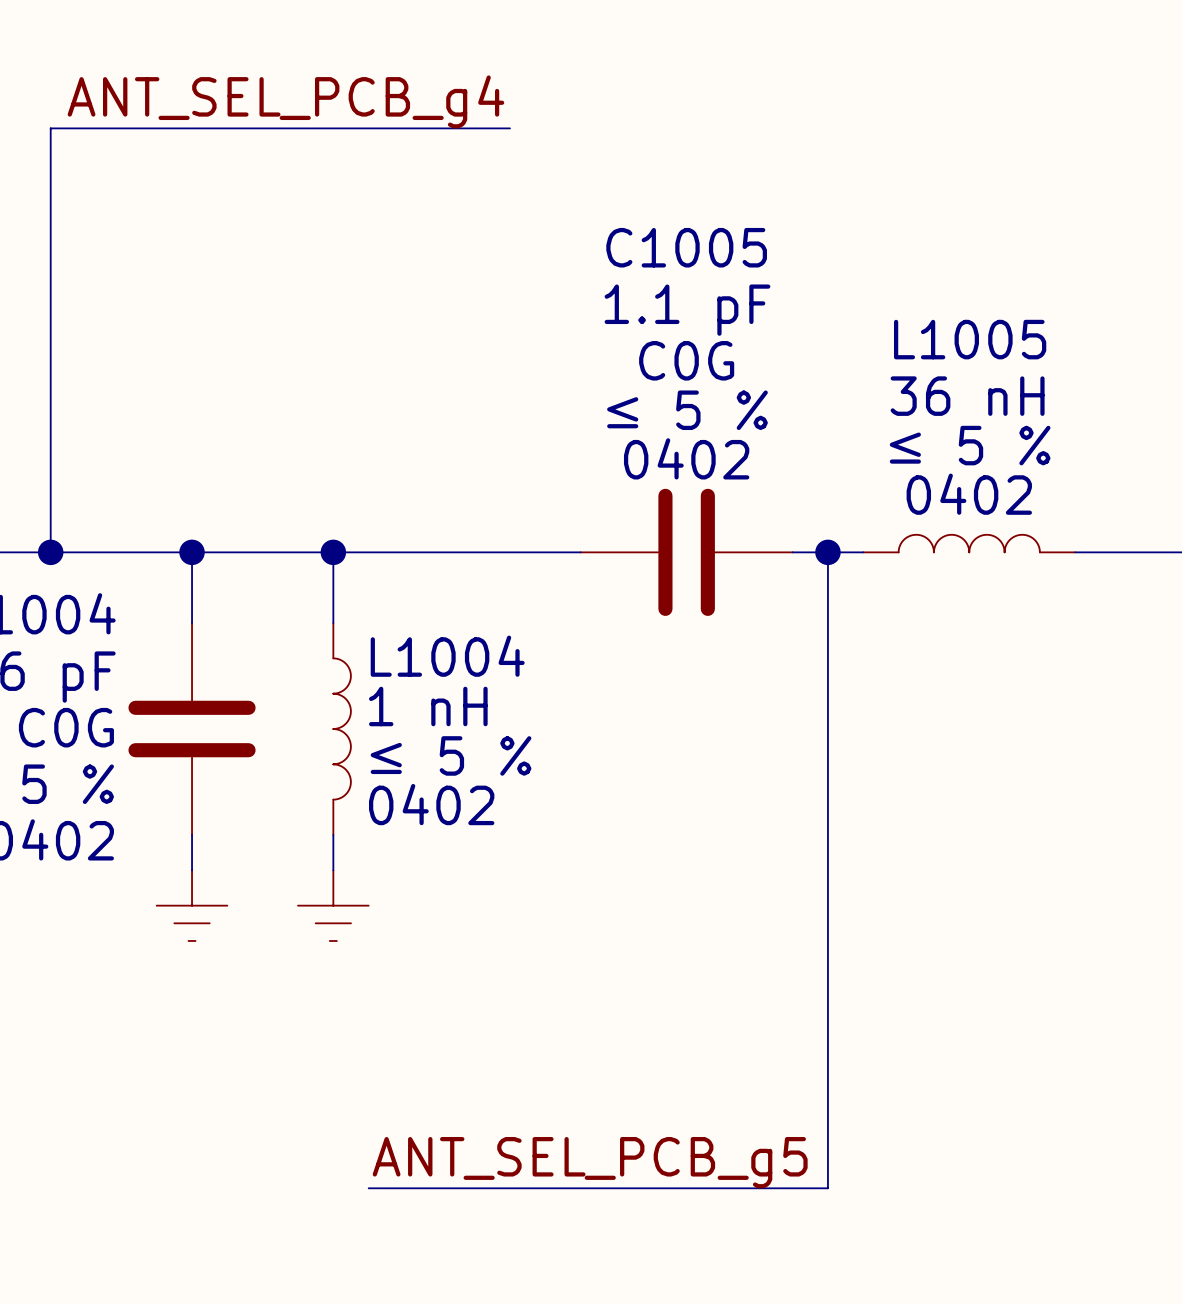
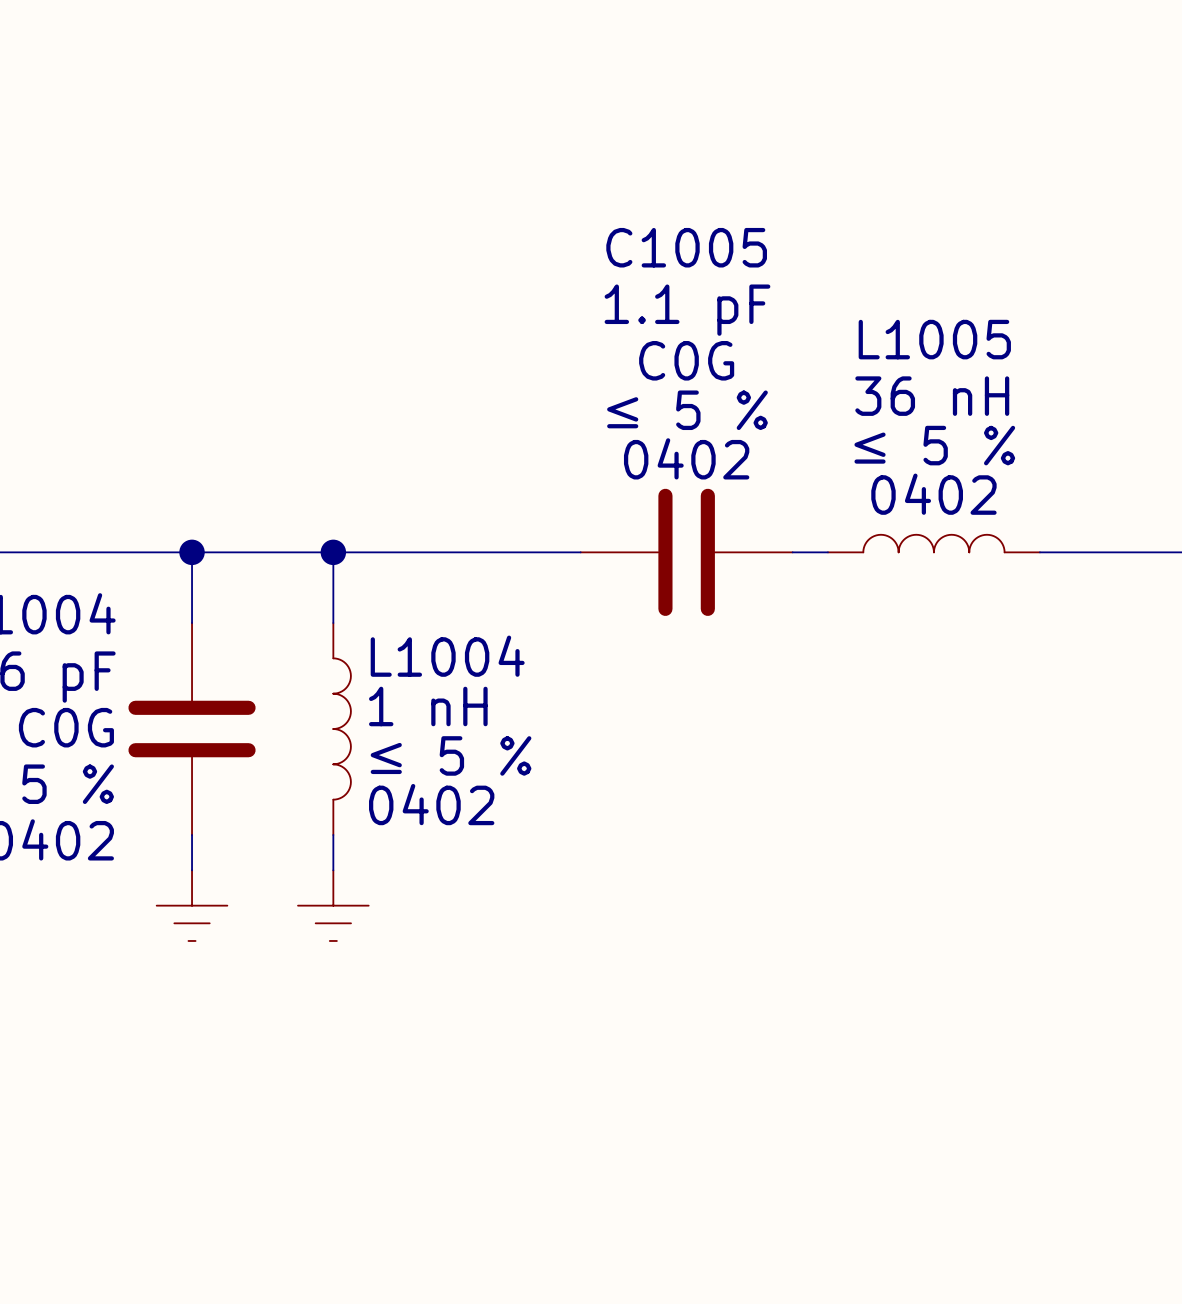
label: ANT_SEL_PCB_g4 (285, 101) -> none
wire: (509, 128) (50, 128) (50, 552) -> none
L1005 position: (969, 543) -> (933, 543)
junction: (50, 552) -> none
junction: (827, 552) -> none
wire: (863, 552) (827, 552) (827, 1188) (368, 1188) -> none
label: ANT_SEL_PCB_g5 (590, 1162) -> none

